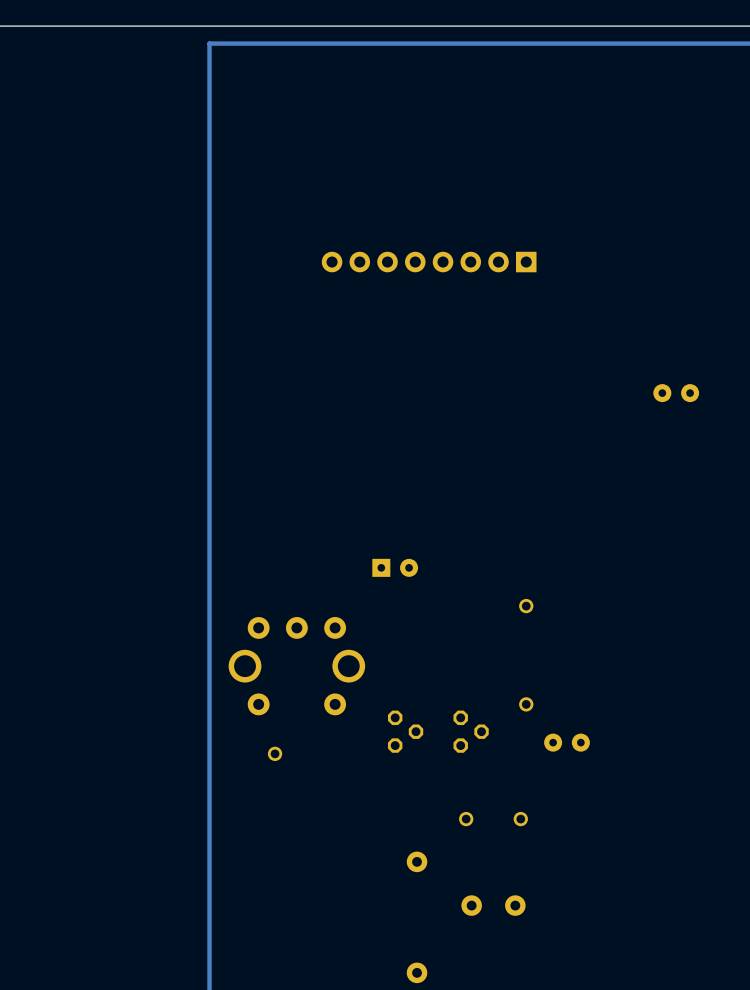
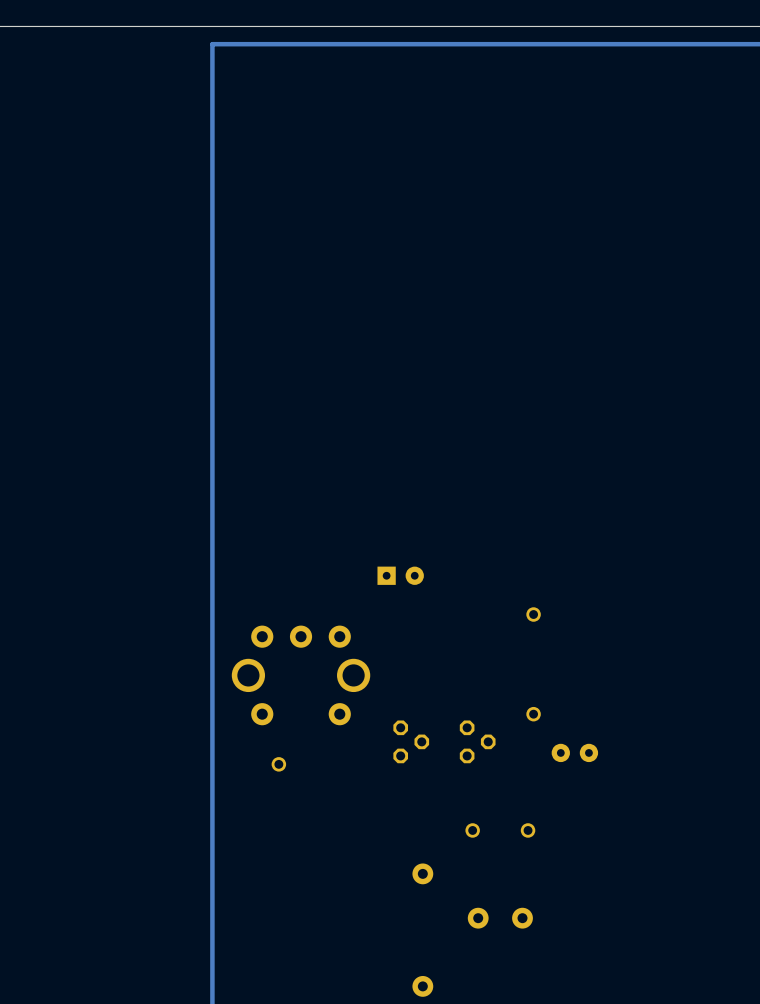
part: (429, 262) -> none
part: (676, 393) -> none

